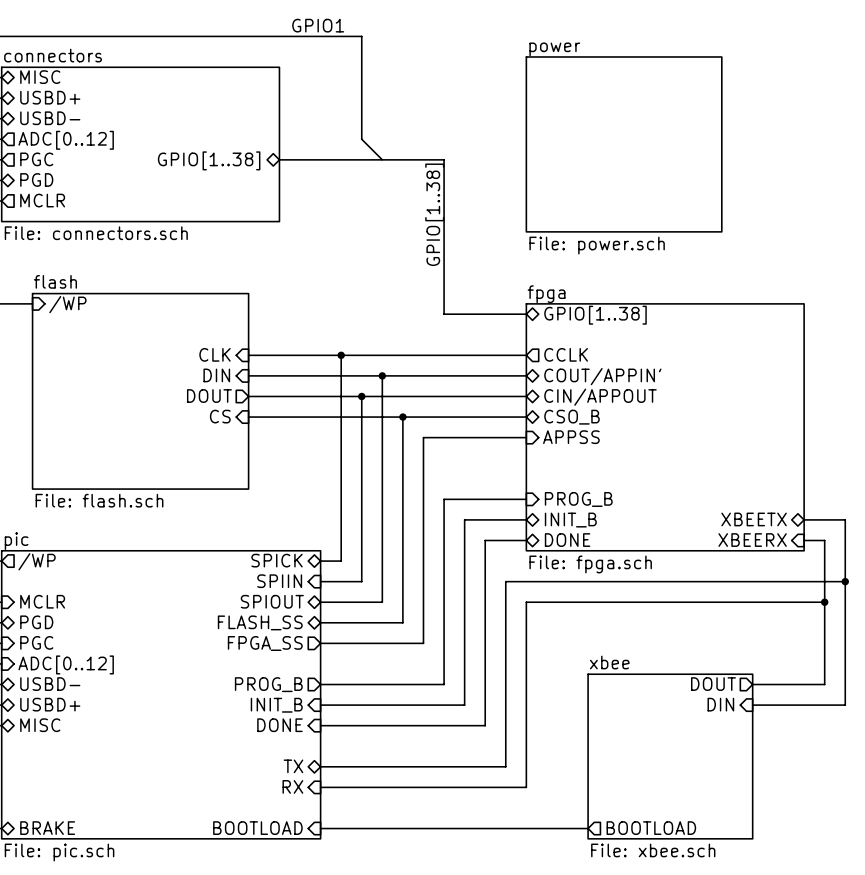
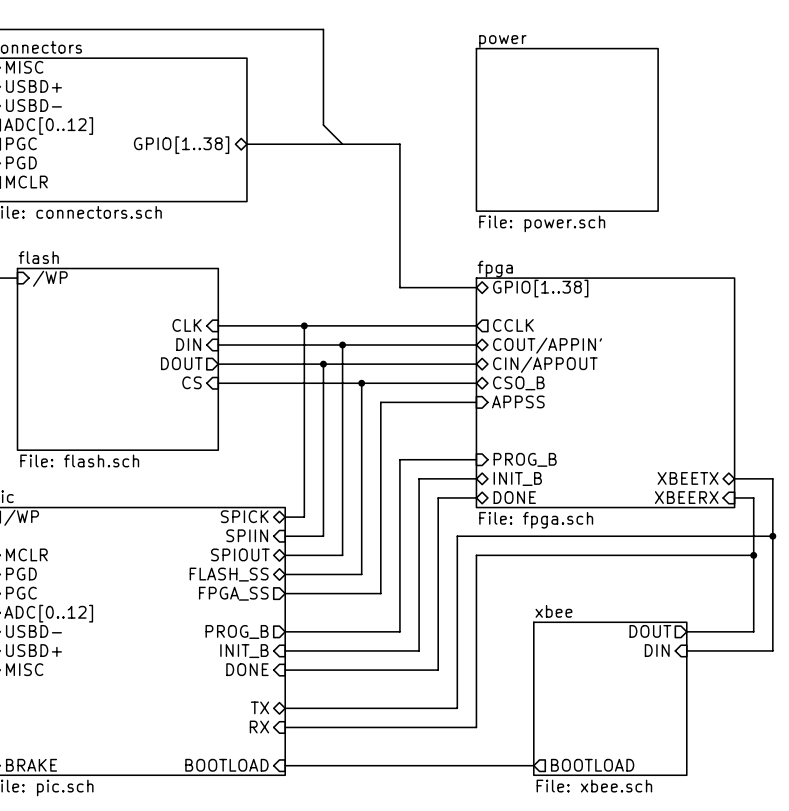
label: GPIO1 (318, 25) -> none
label: GPIO[1..38] (434, 214) -> none

